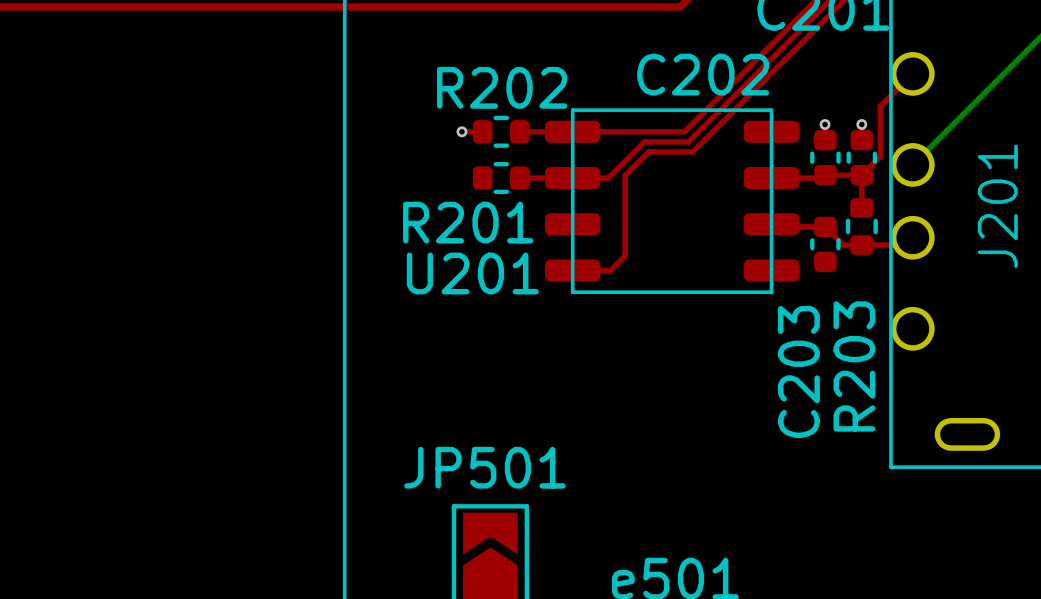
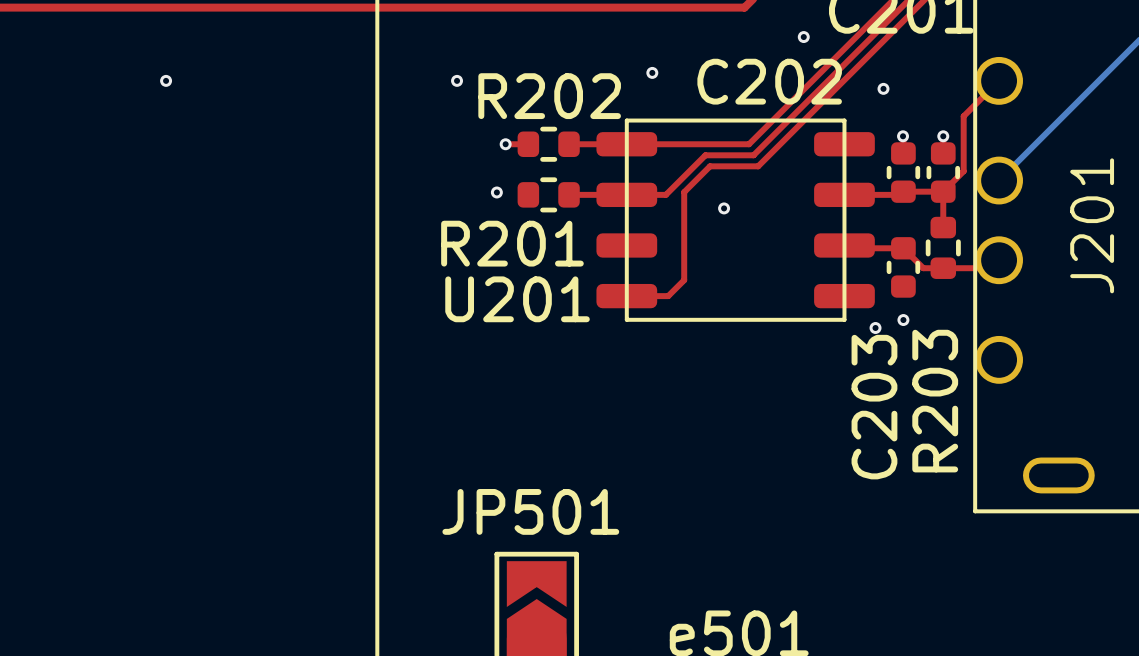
via: none -> (803, 37)
via: none -> (652, 72)
via: none -> (166, 80)
via: none -> (457, 80)
via: none -> (883, 88)
via: none -> (496, 192)
via: none -> (724, 208)
via: none -> (903, 320)
via: none -> (875, 327)

